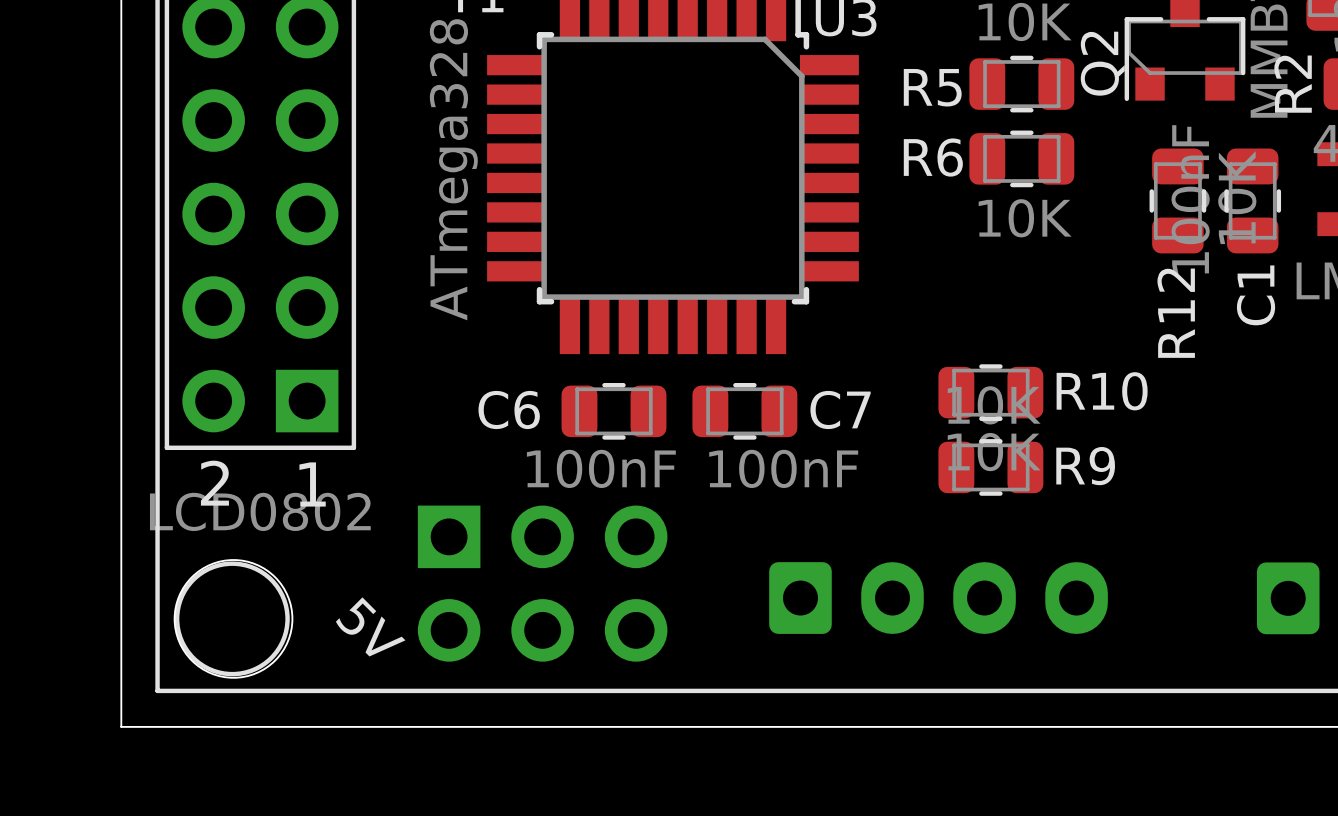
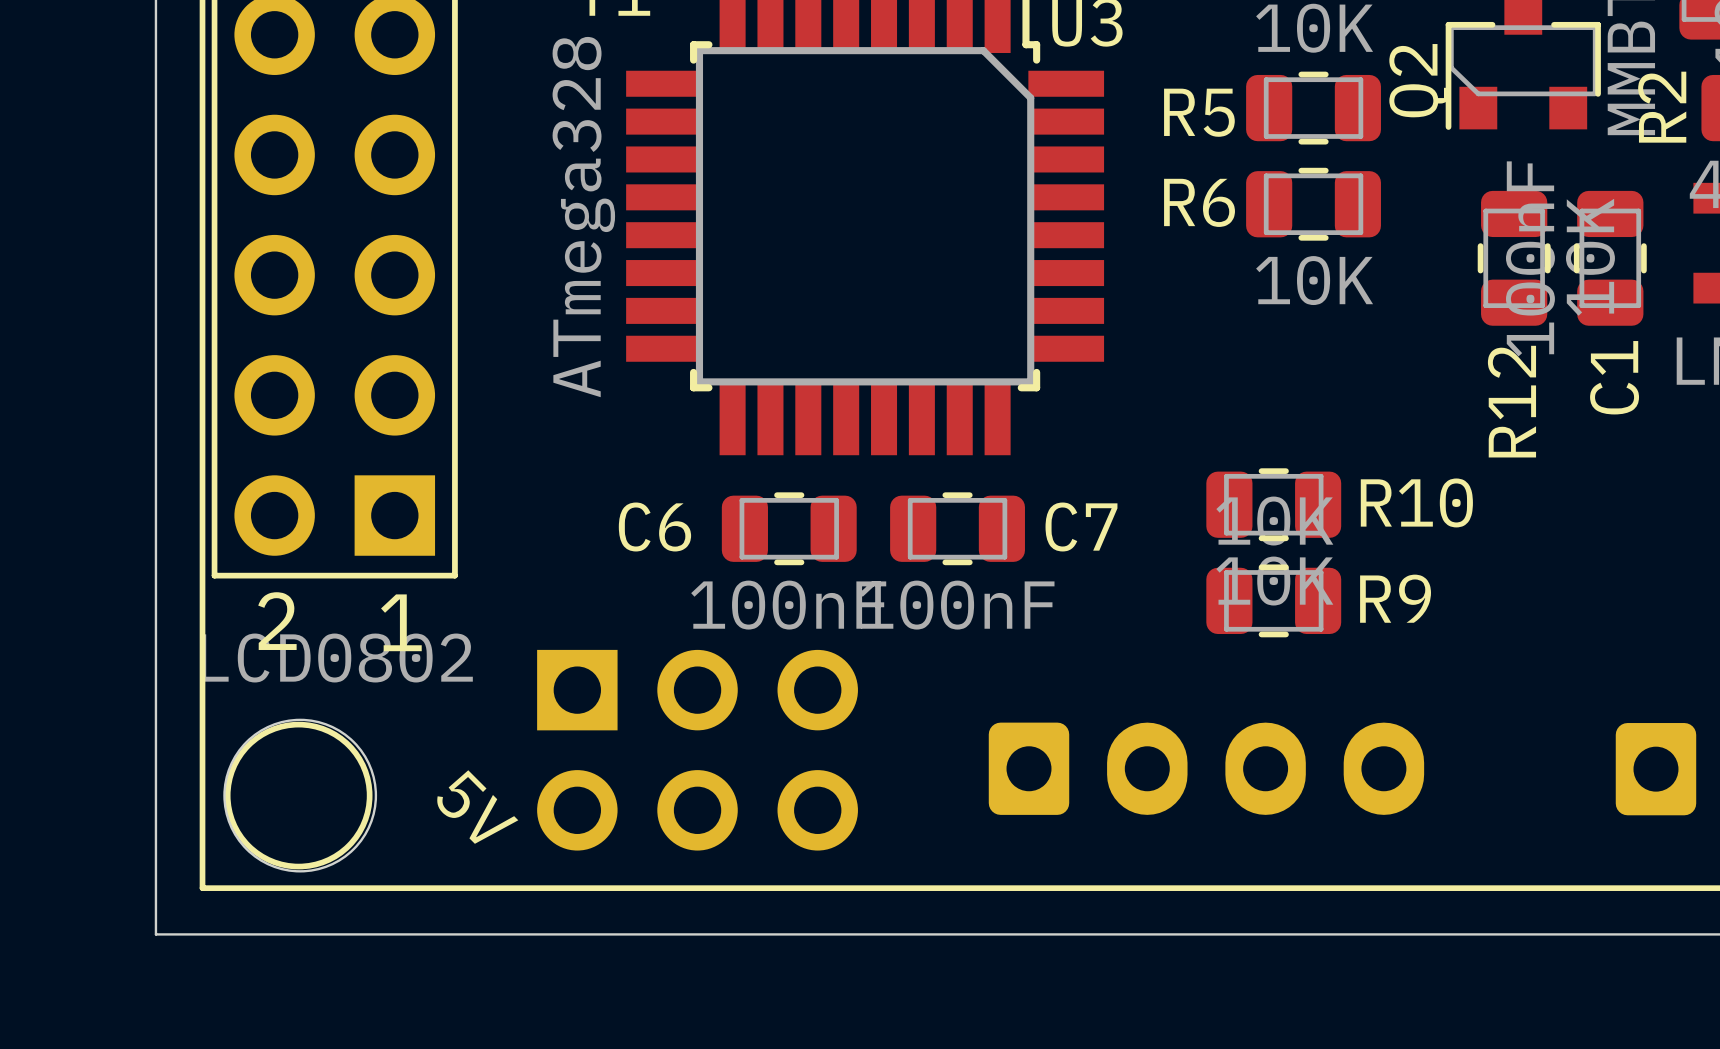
C6 value position: 100nF (601, 468) -> 100nF (788, 605)
C7 value position: 100nF (783, 468) -> 100nF (956, 605)

